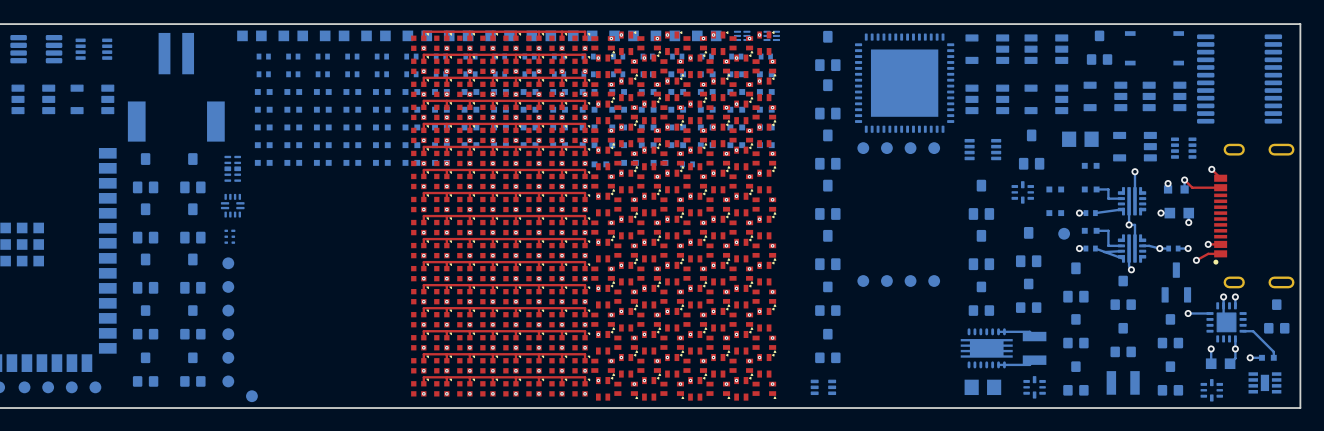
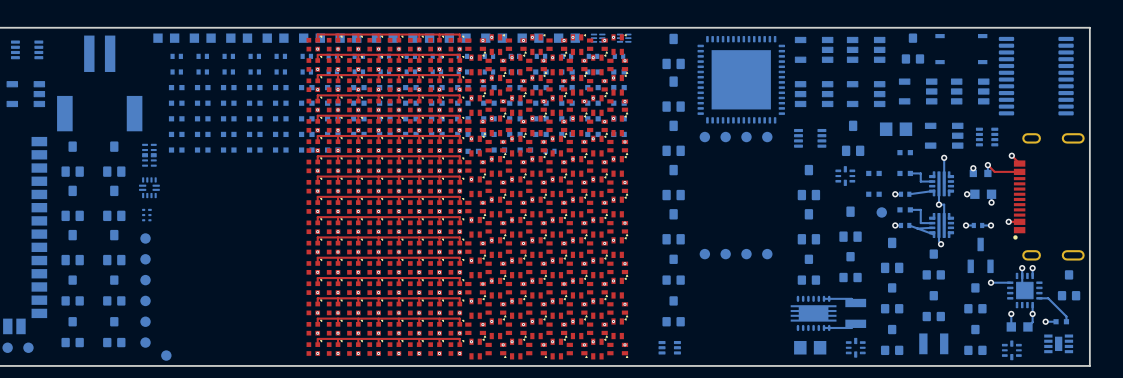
bottom track: (1142, 245) (1159, 248) -> none
top track: (1220, 253) (1208, 253) (1196, 260) -> none
via: (1196, 260) -> none

